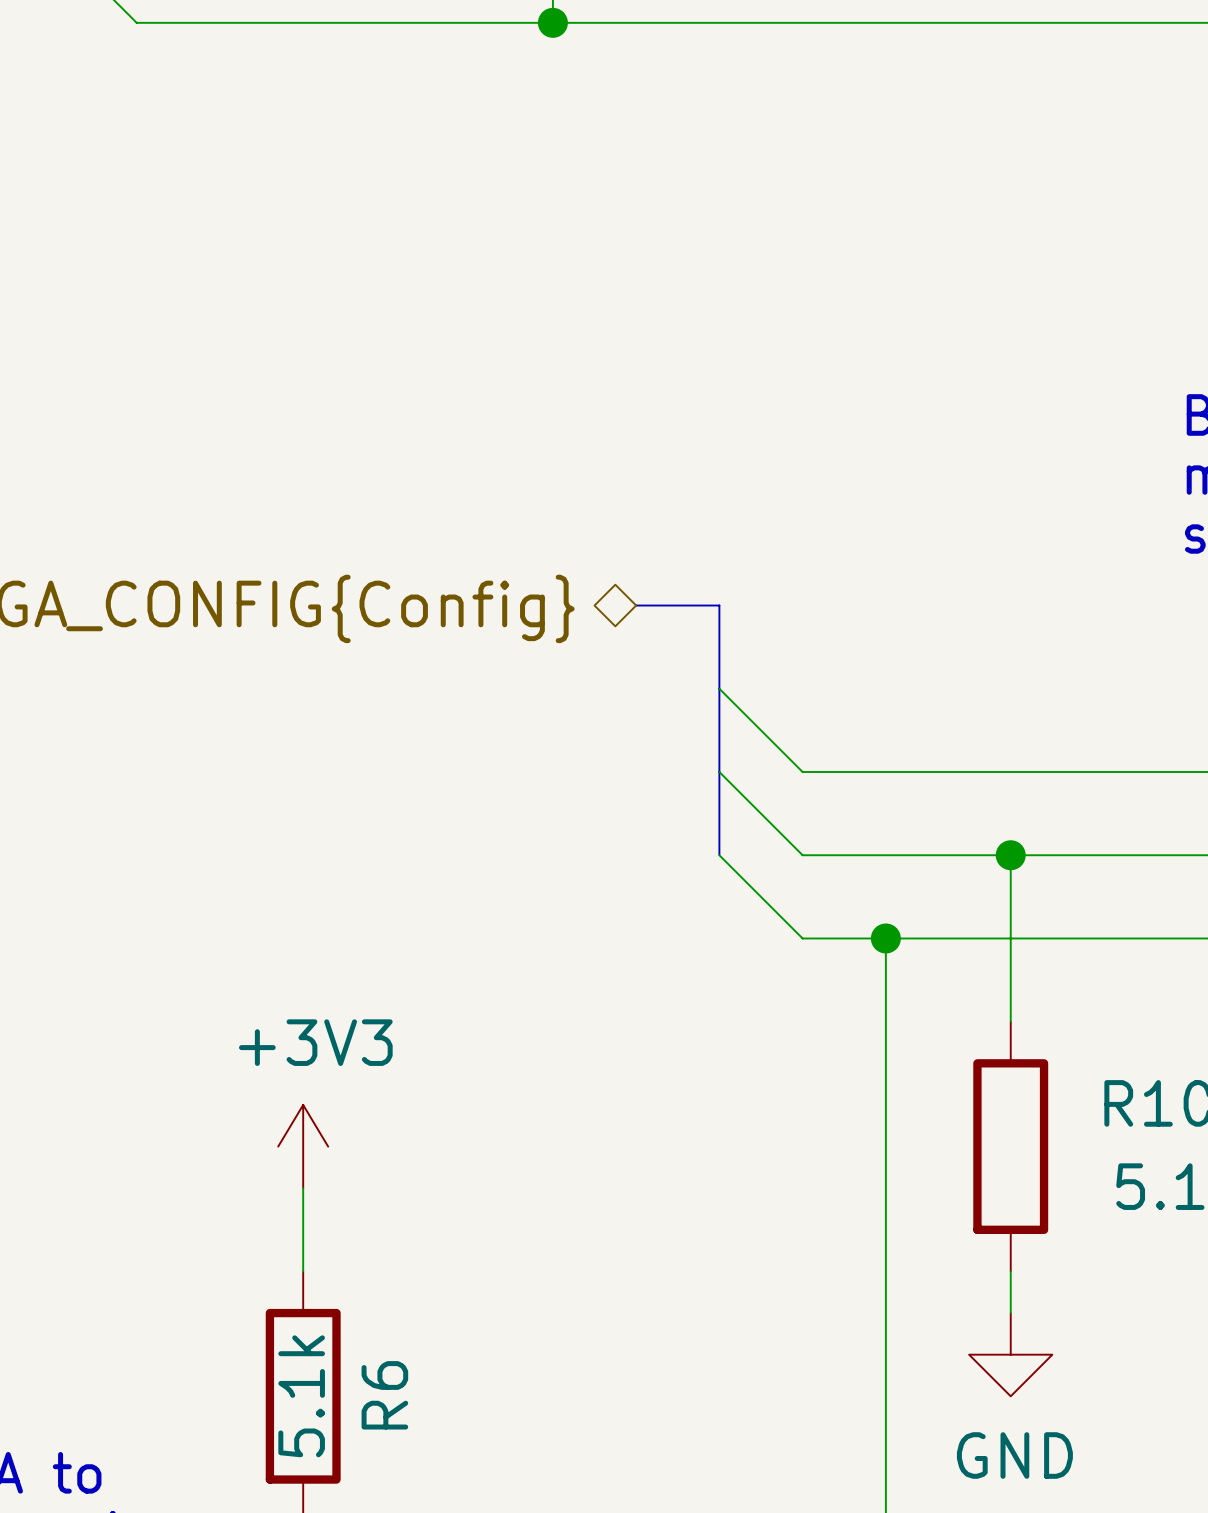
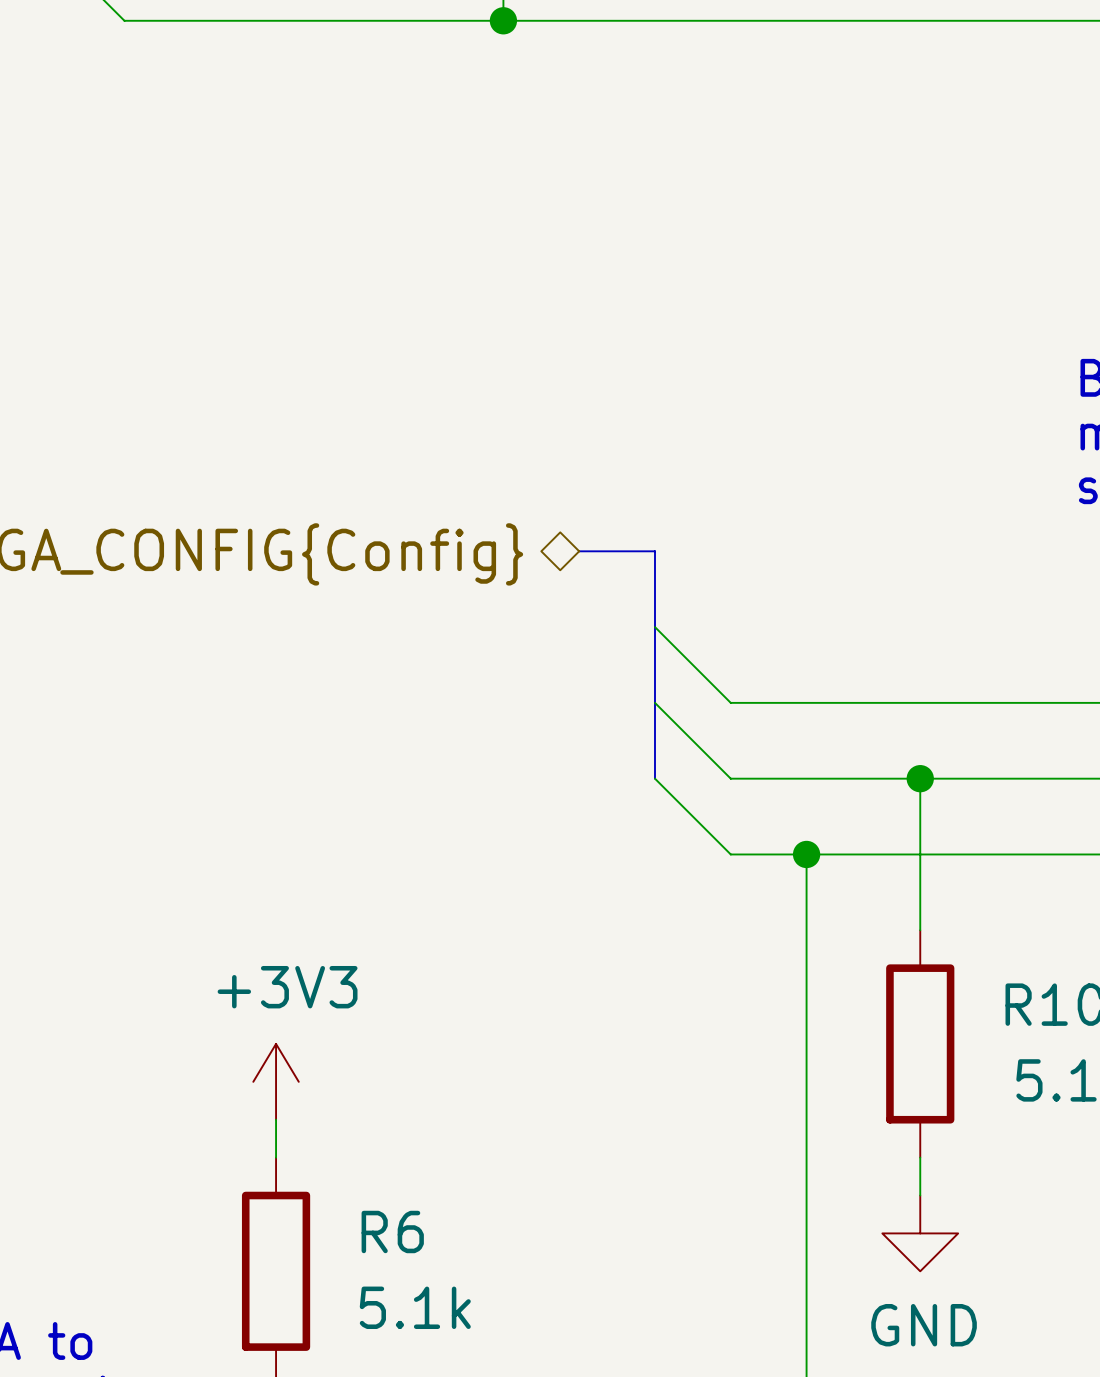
power symbol position: +3V3 (303, 1146) -> +3V3 (276, 1081)
R6 name rotation: 0° (384, 1395) -> 90° clockwise (392, 1231)
R6 value rotation: 0° (301, 1396) -> 90° clockwise (415, 1307)
R6 value position: 5.1k (301, 1396) -> 5.1k (415, 1307)

